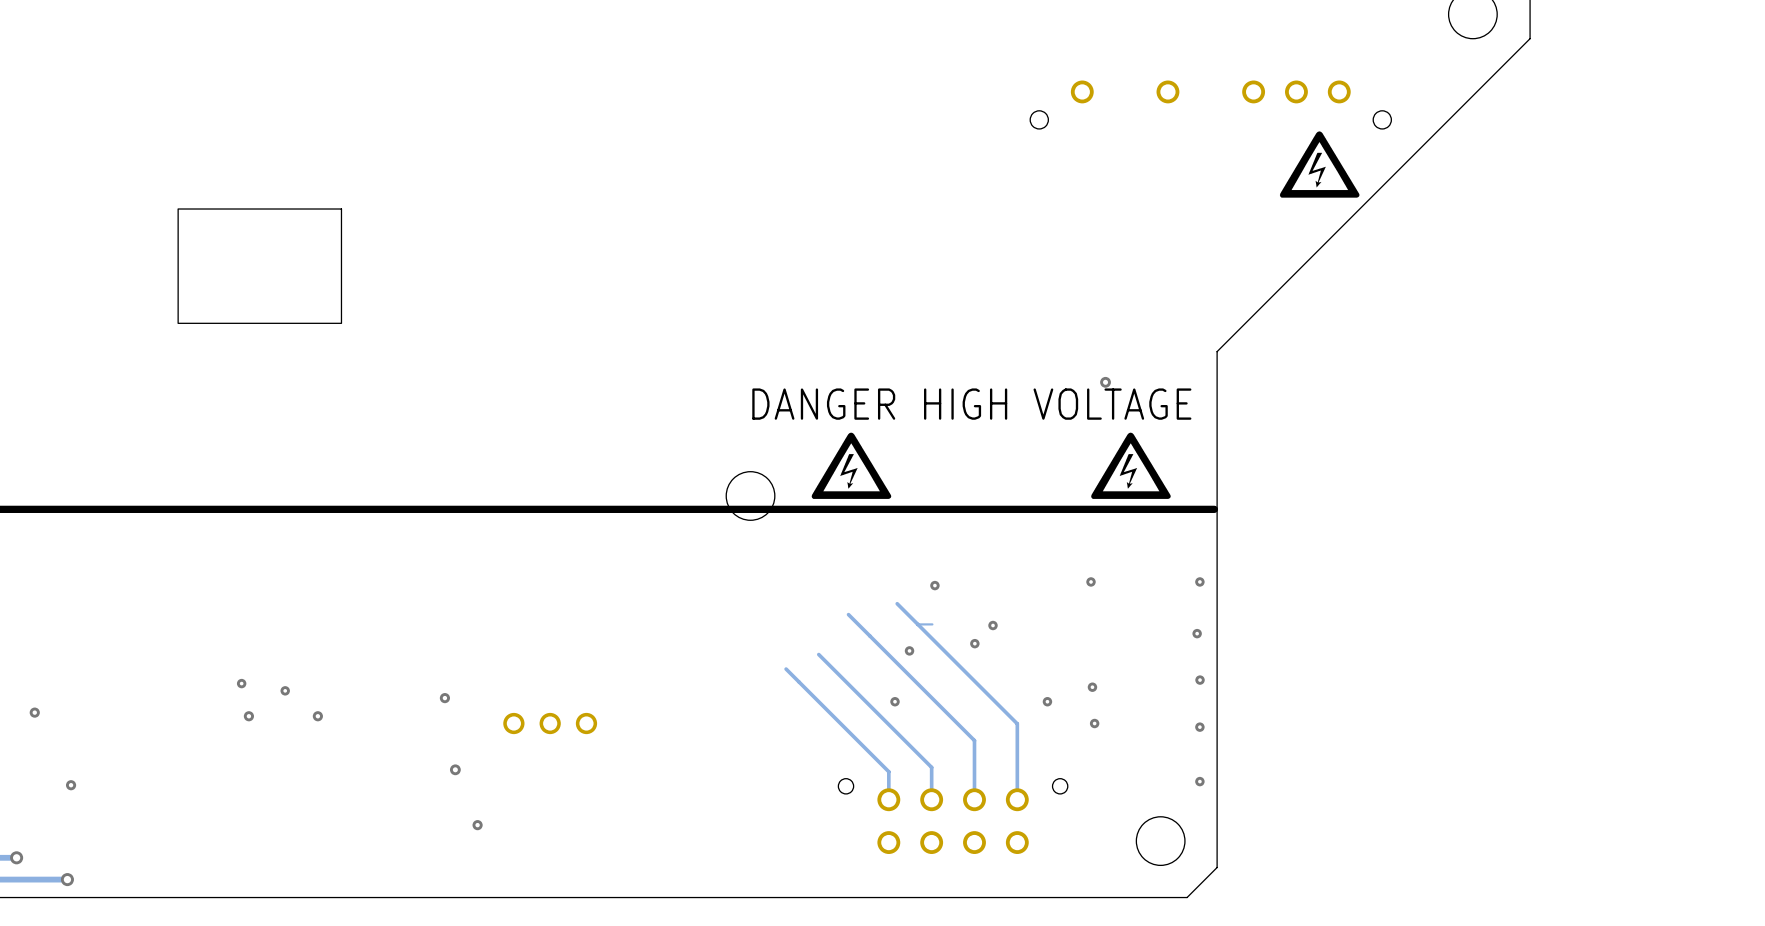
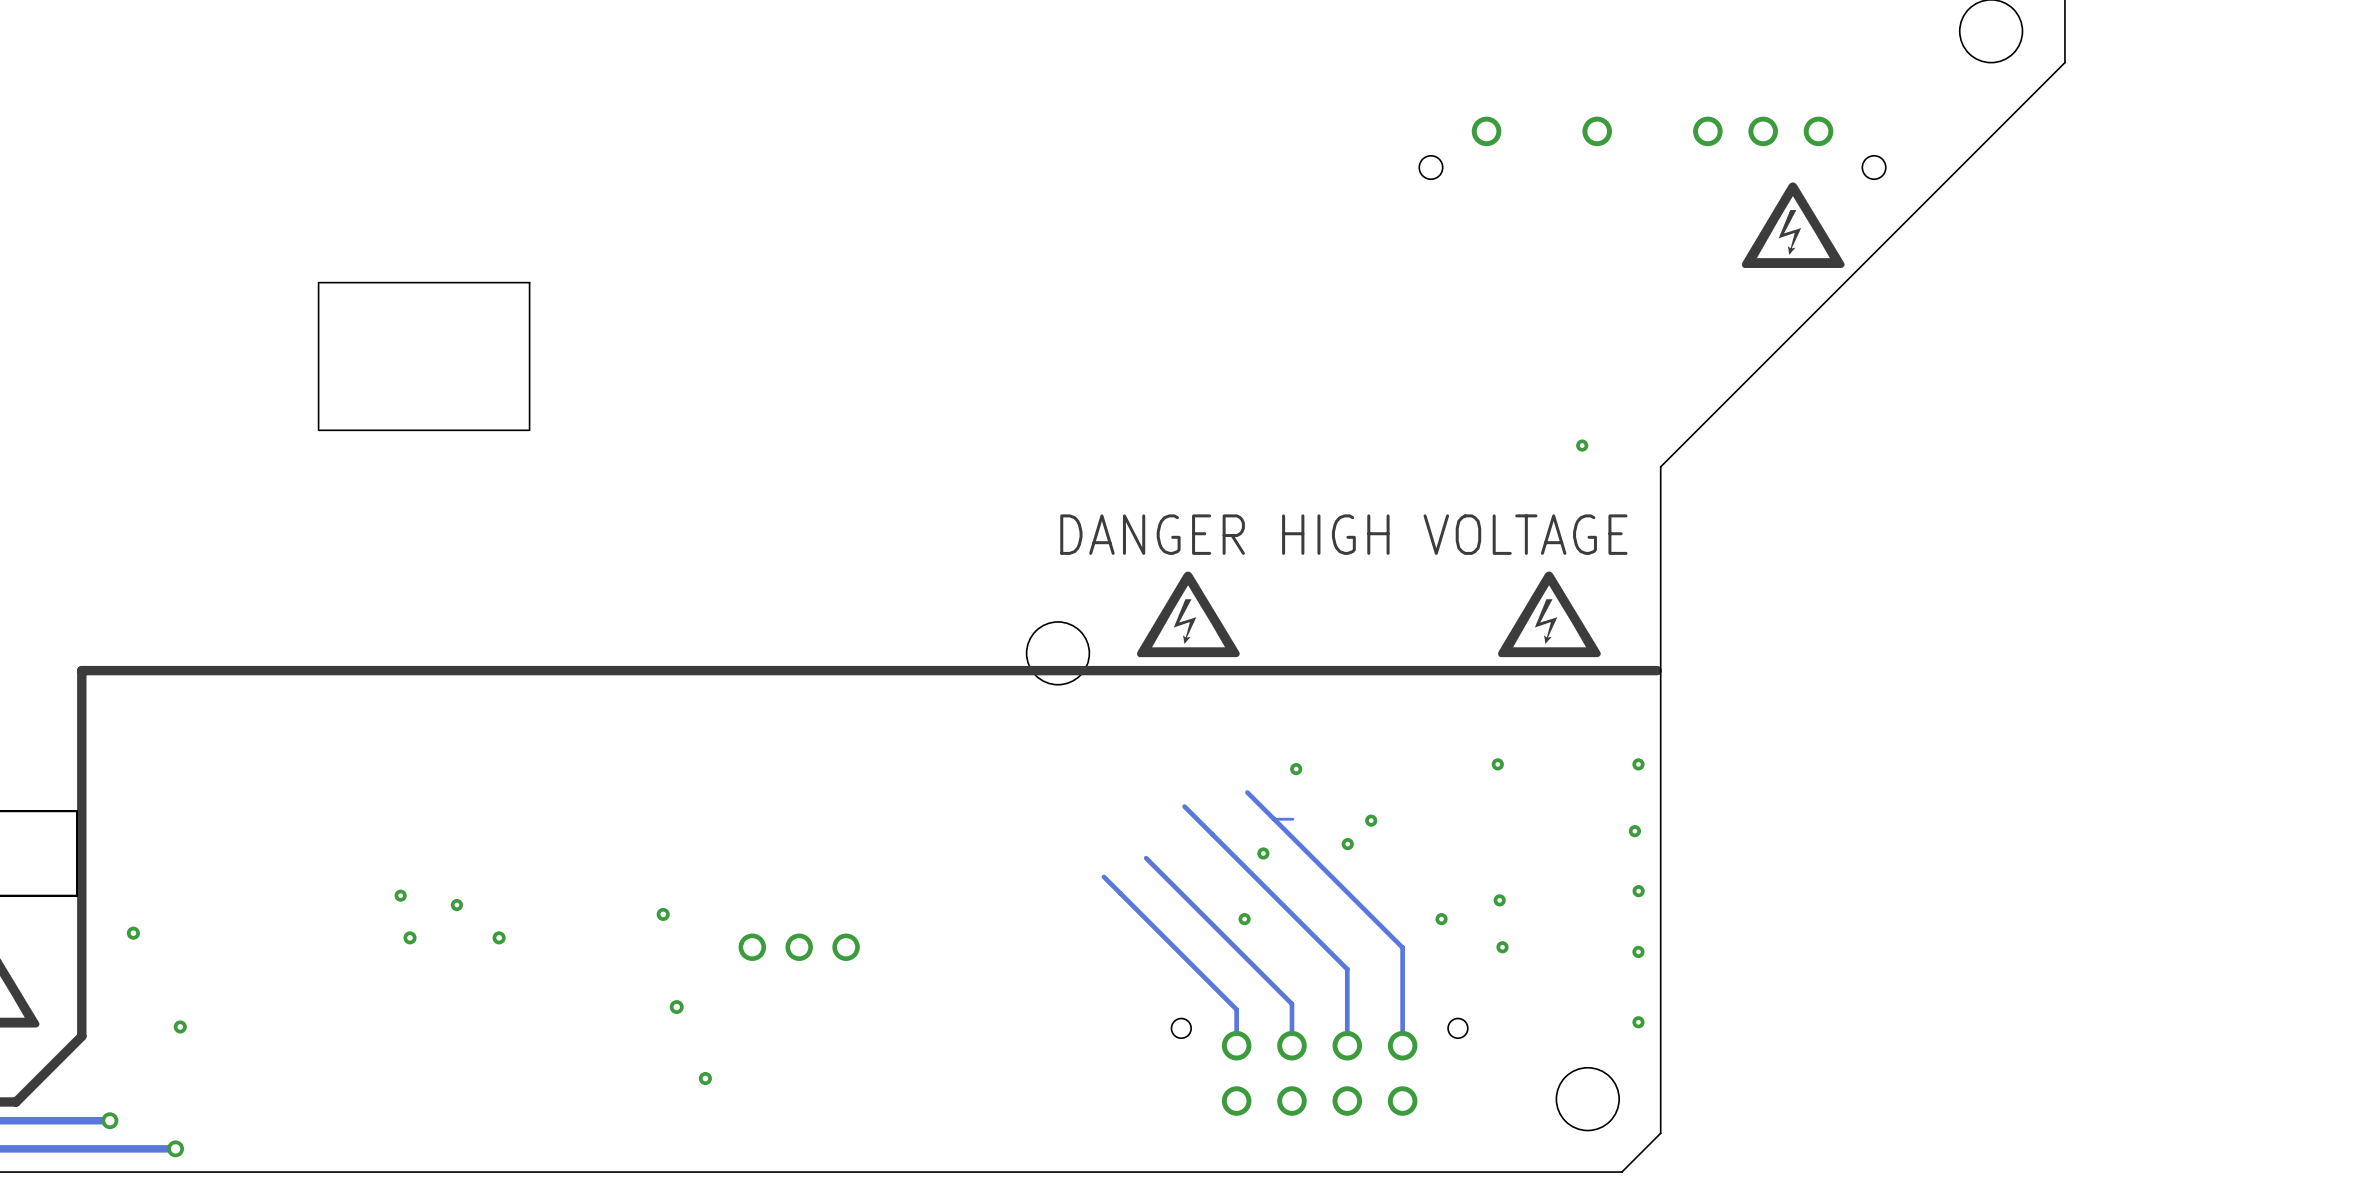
via: none -> (1582, 445)
via: (1105, 382) -> none

